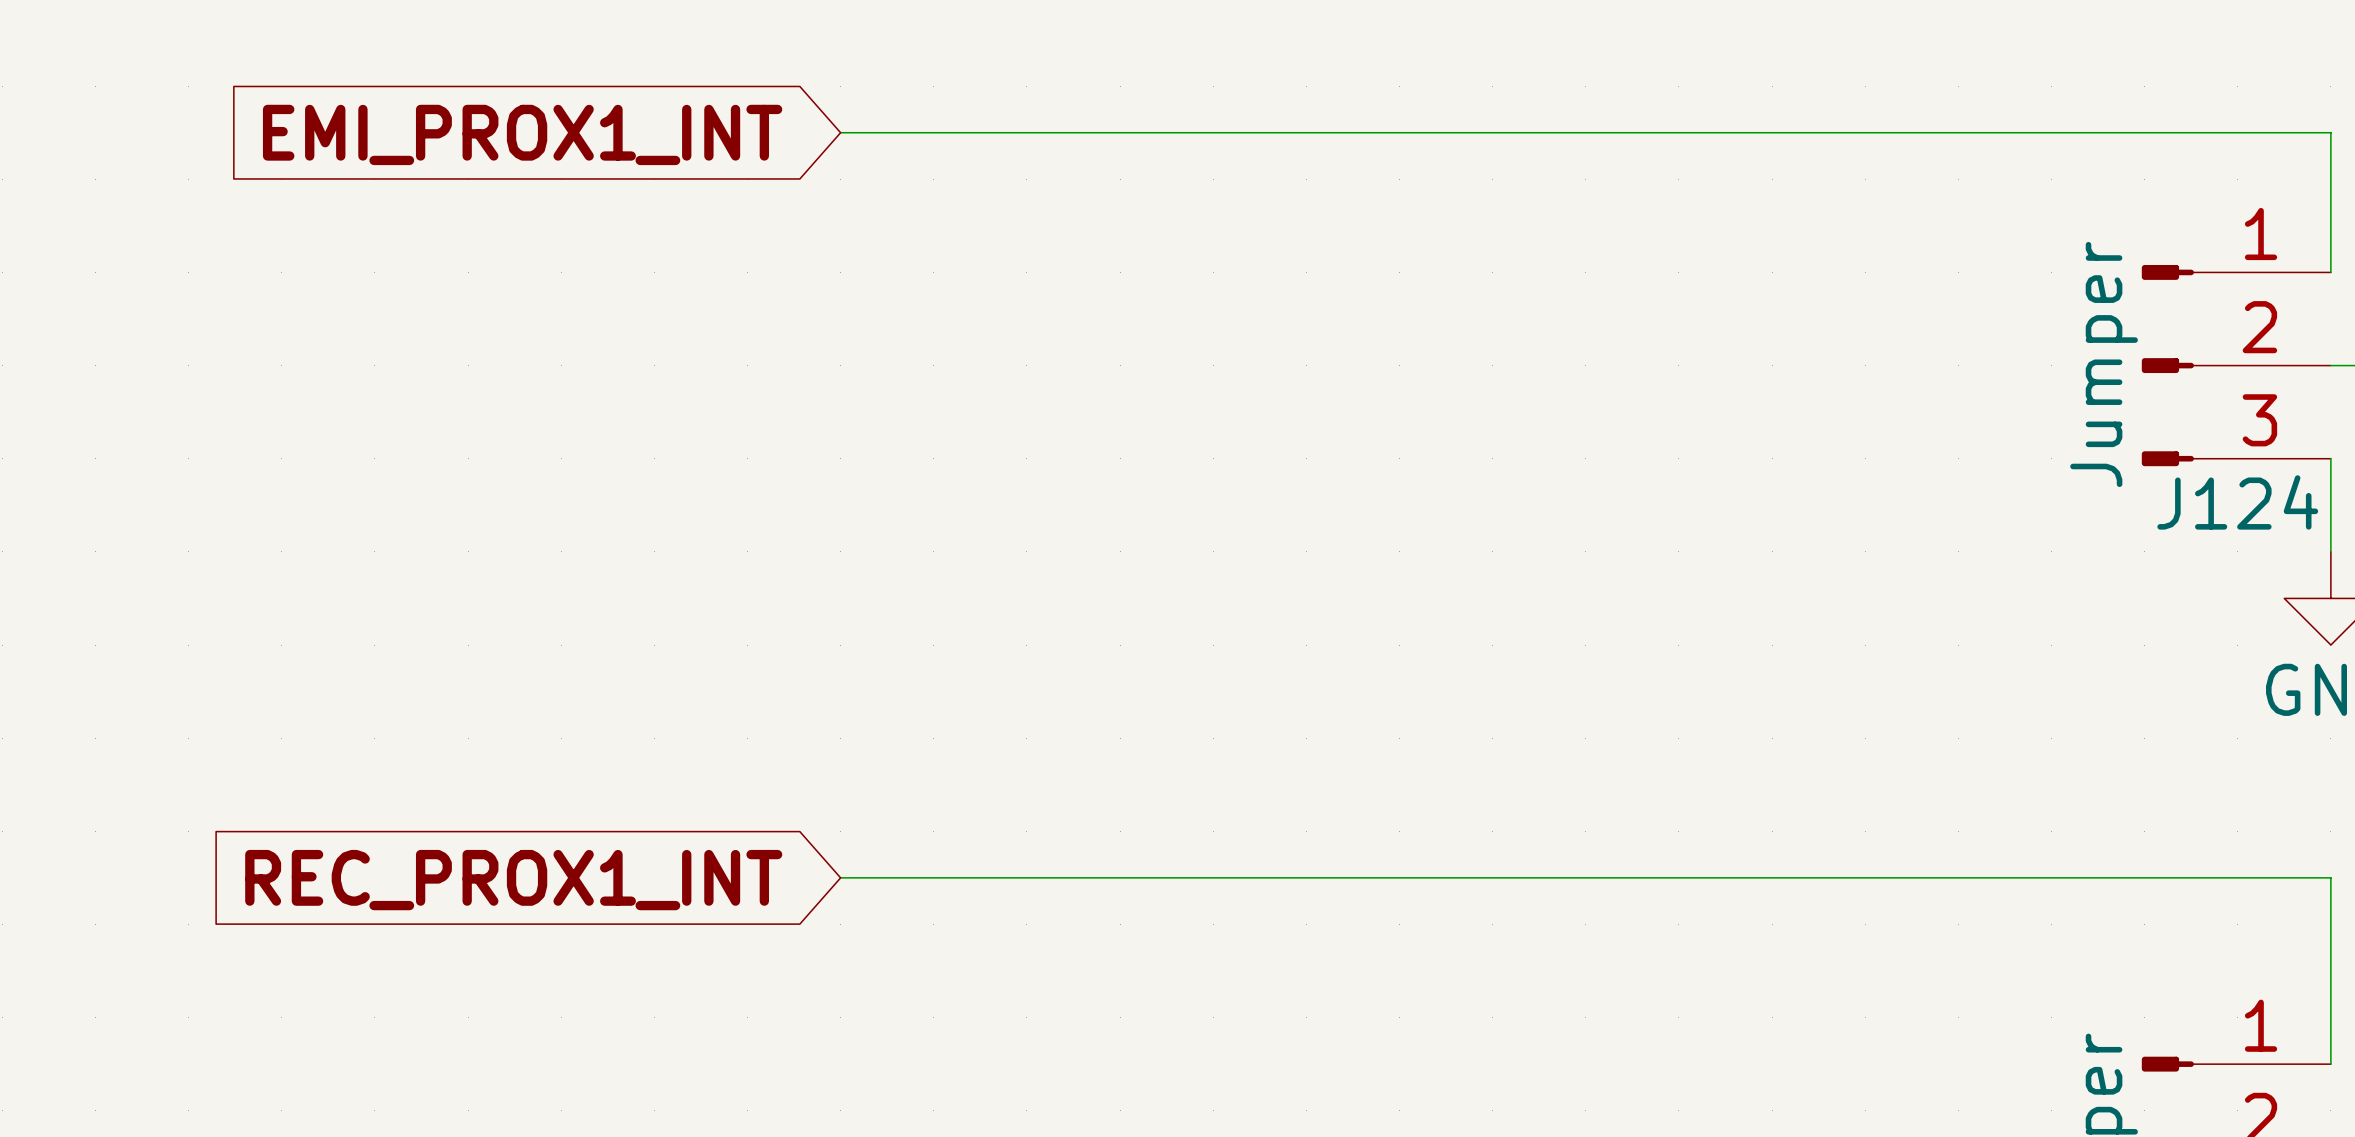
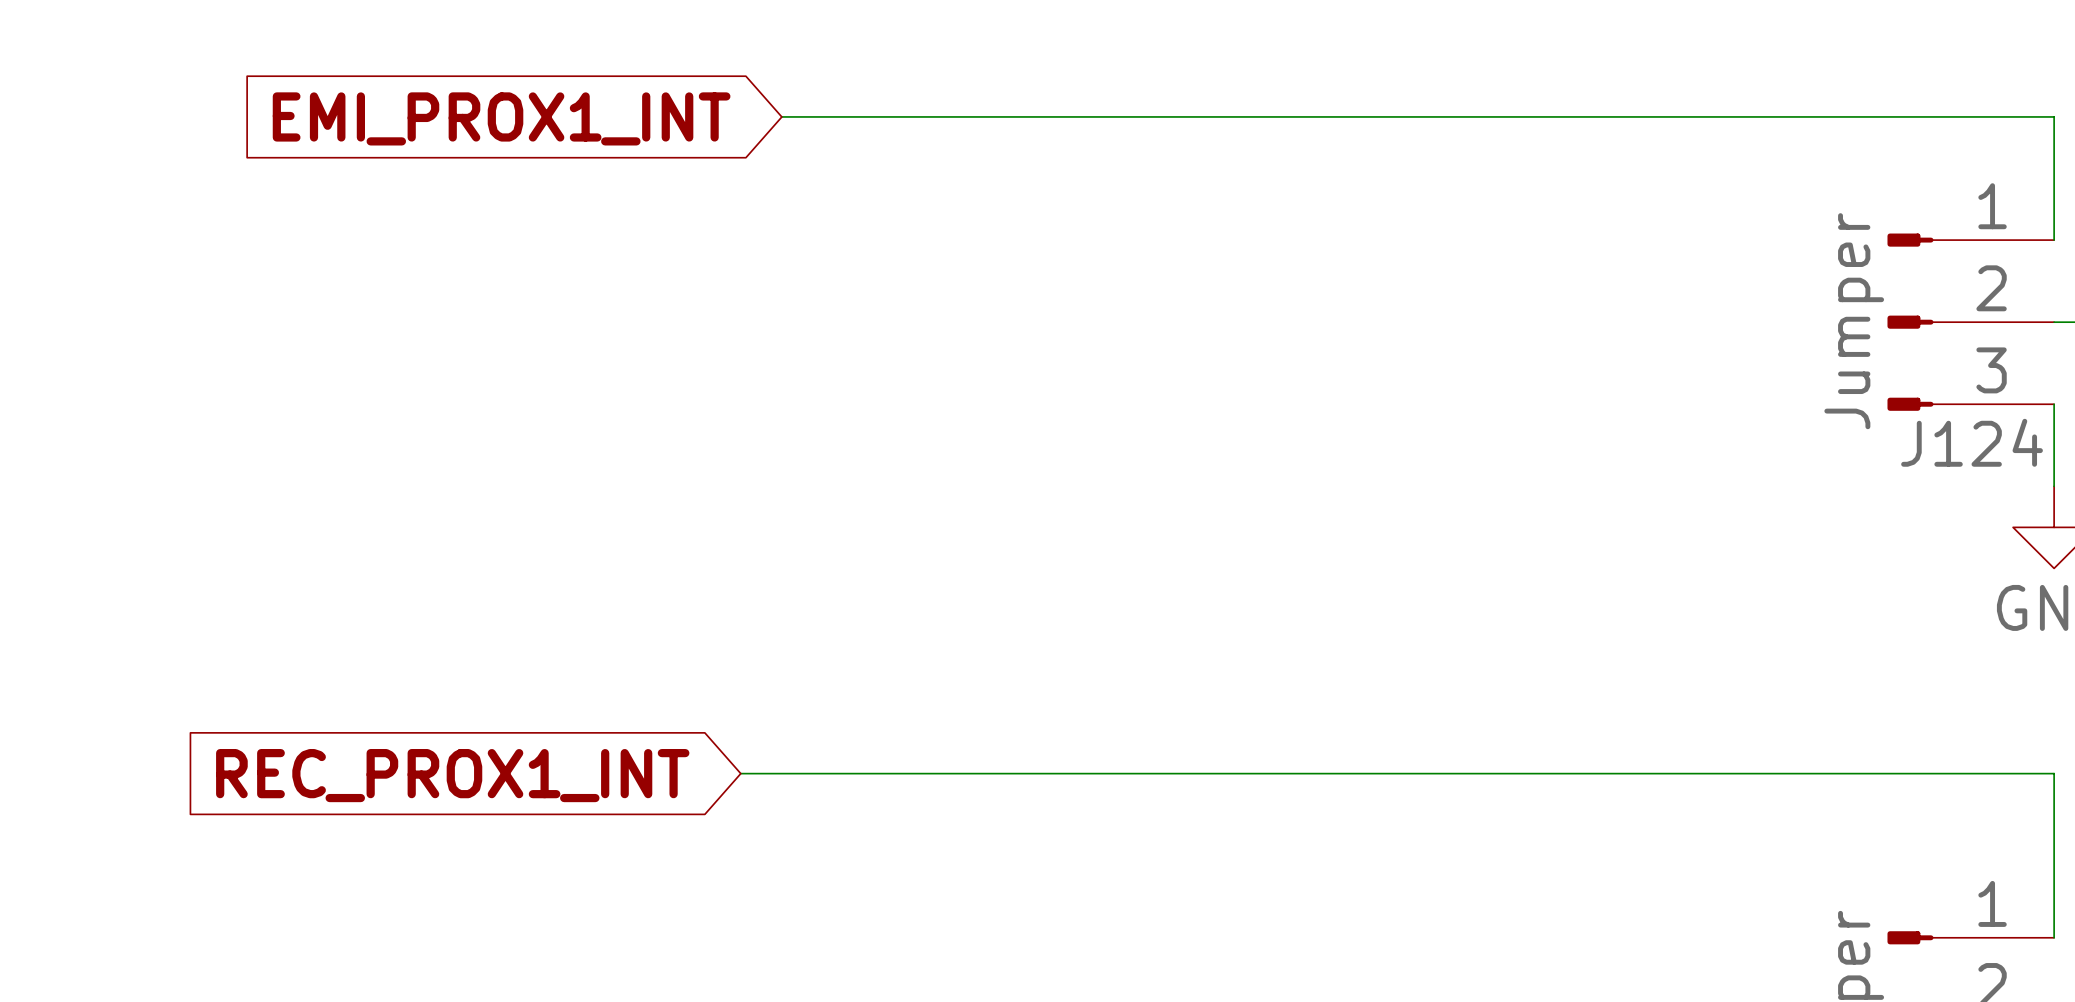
wire: (840, 132) (887, 132) -> none
global label position: EMI_PROX1_INT (522, 134) -> EMI_PROX1_INT (501, 118)

